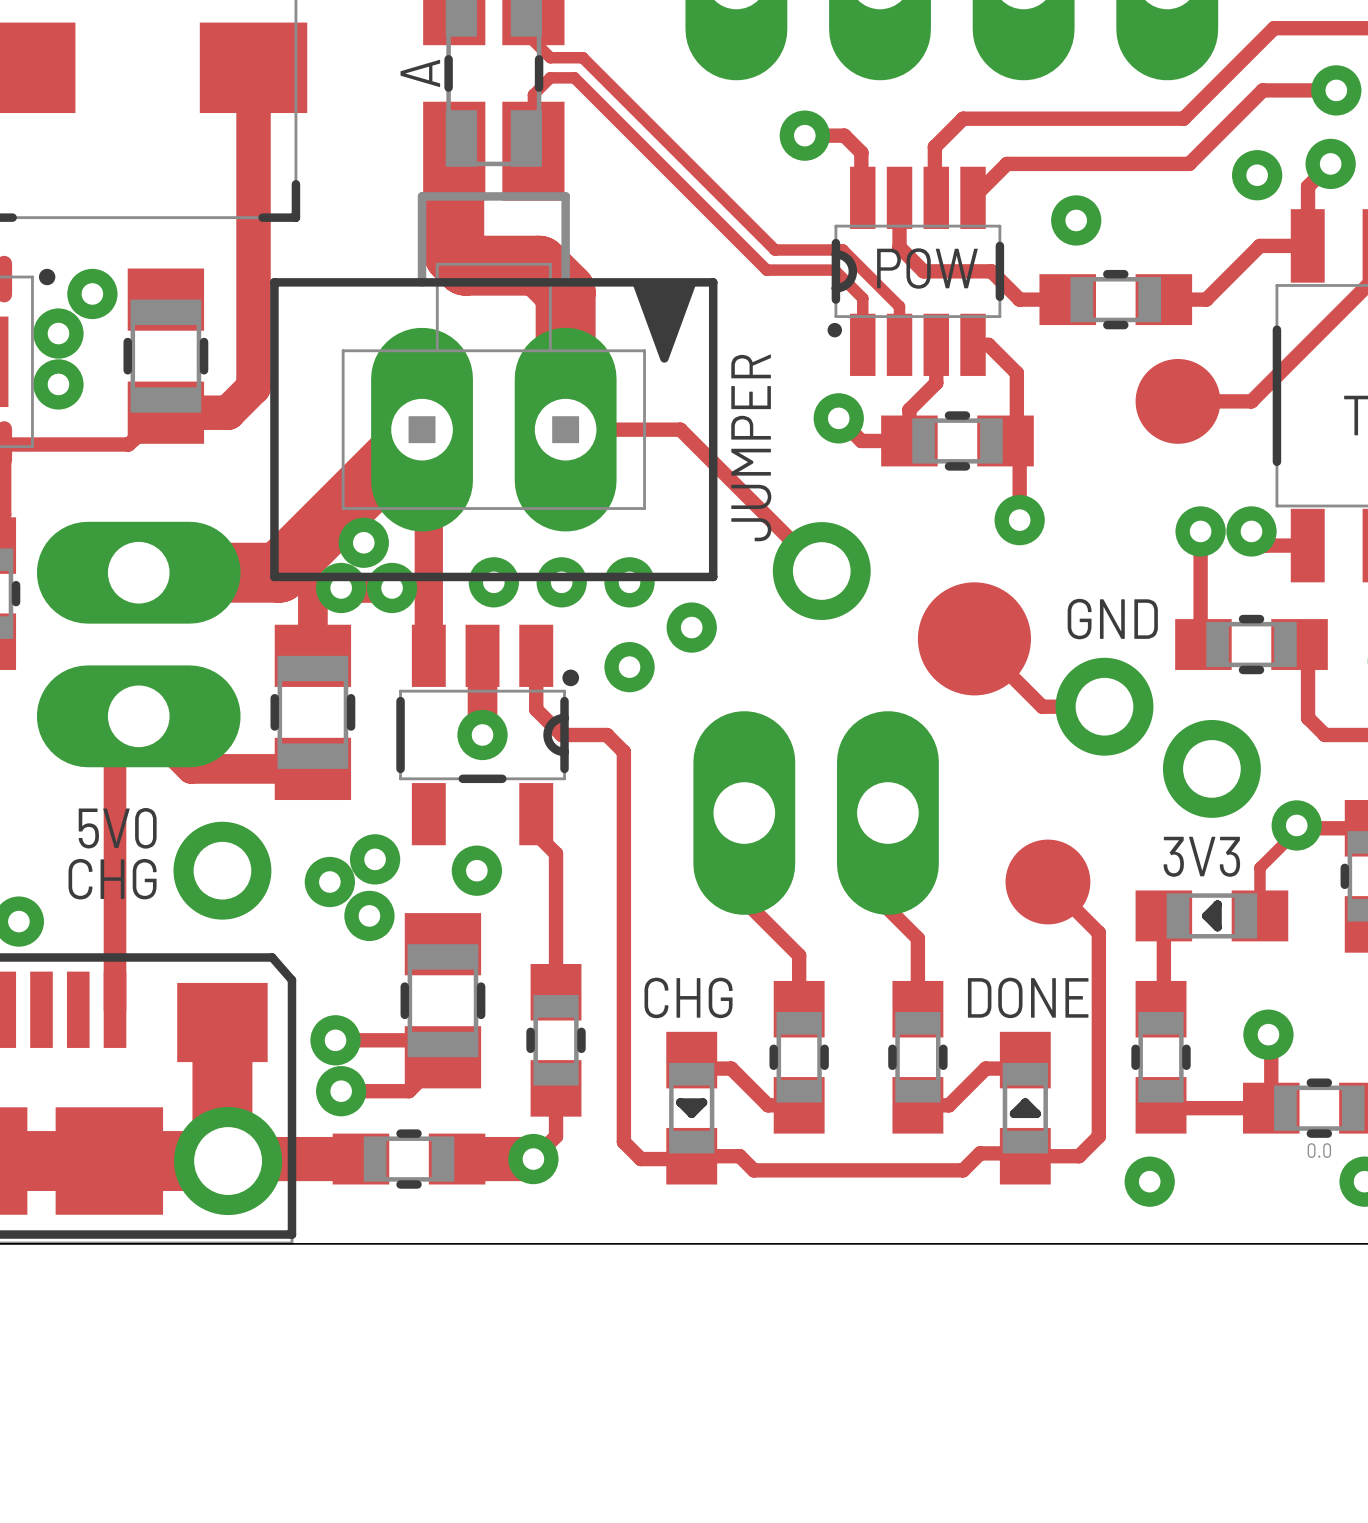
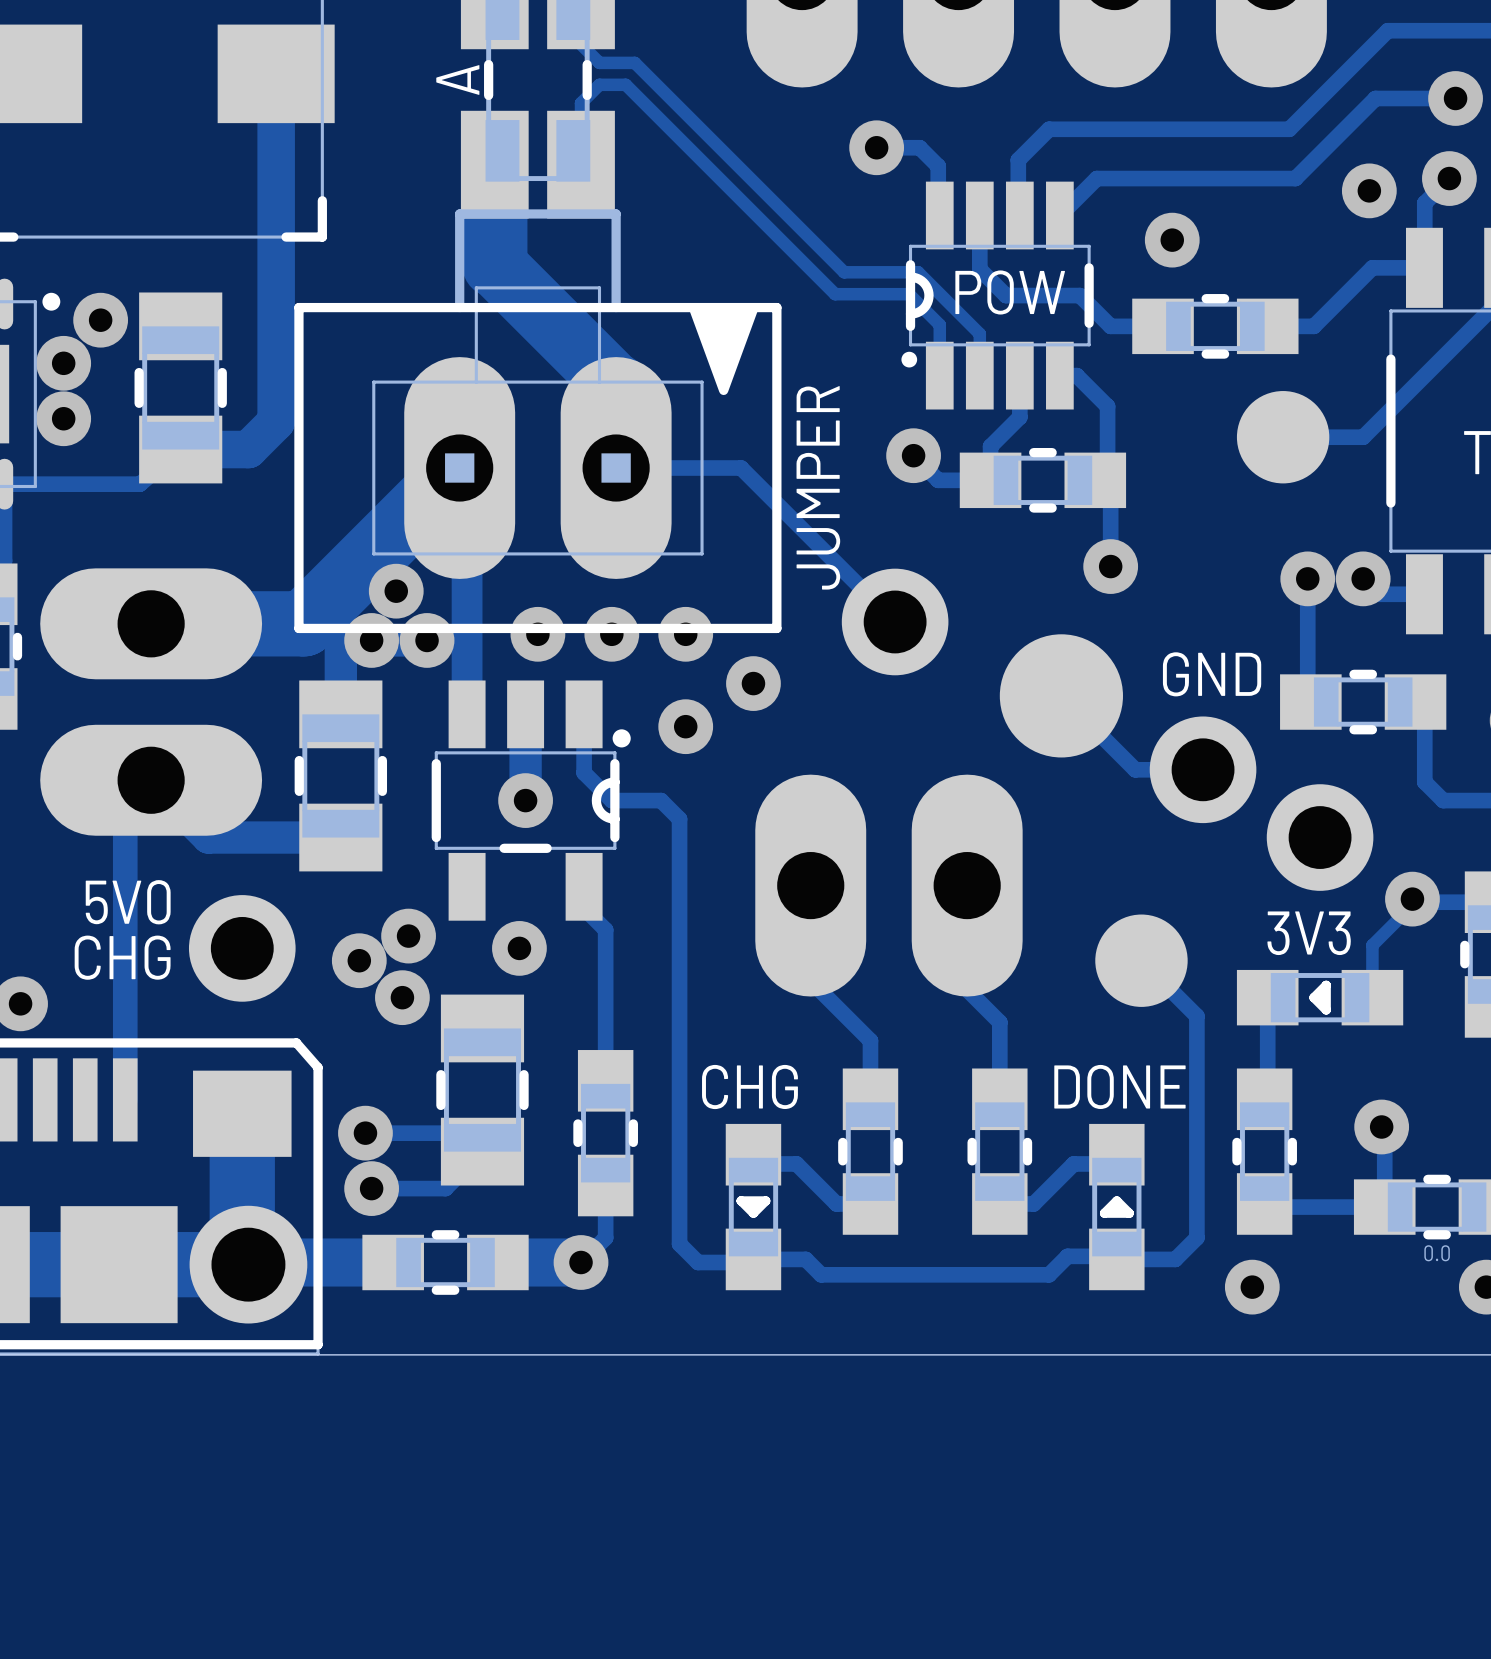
track: (454, 243) (454, 254) (465, 265) (539, 265) (565, 292) (565, 354) -> (494, 264) (616, 386)

